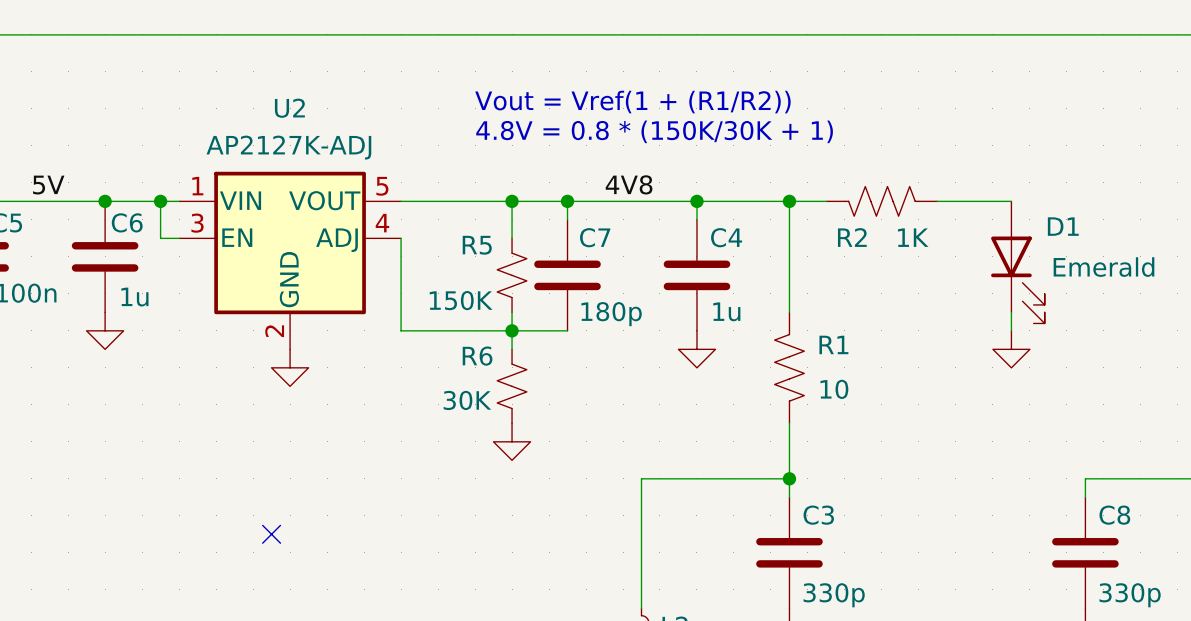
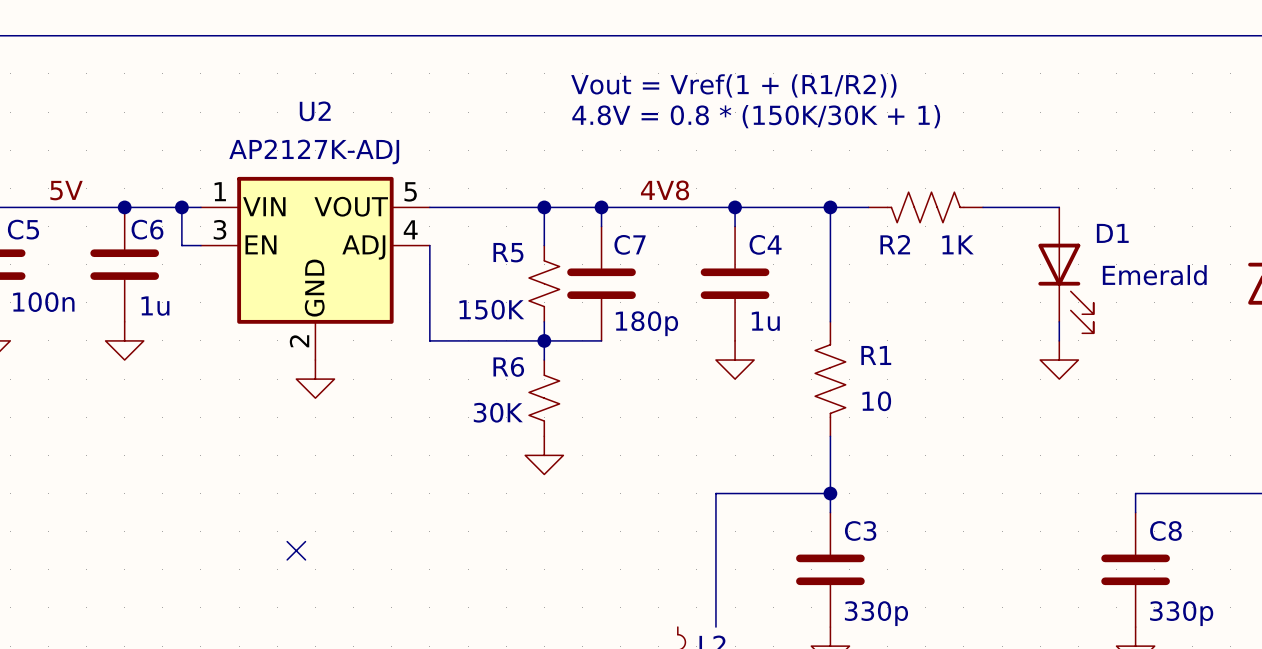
text position: Vout = Vref(1 + (R1/R2)) (632, 102) -> Vout = Vref(1 + (R1/R2)) (733, 85)
text position: 4.8V = 0.8 * (150K/30K + 1) (654, 131) -> 4.8V = 0.8 * (150K/30K + 1) (756, 116)
wire: (678, 478) (641, 478) (641, 608) -> (715, 493) (715, 627)

